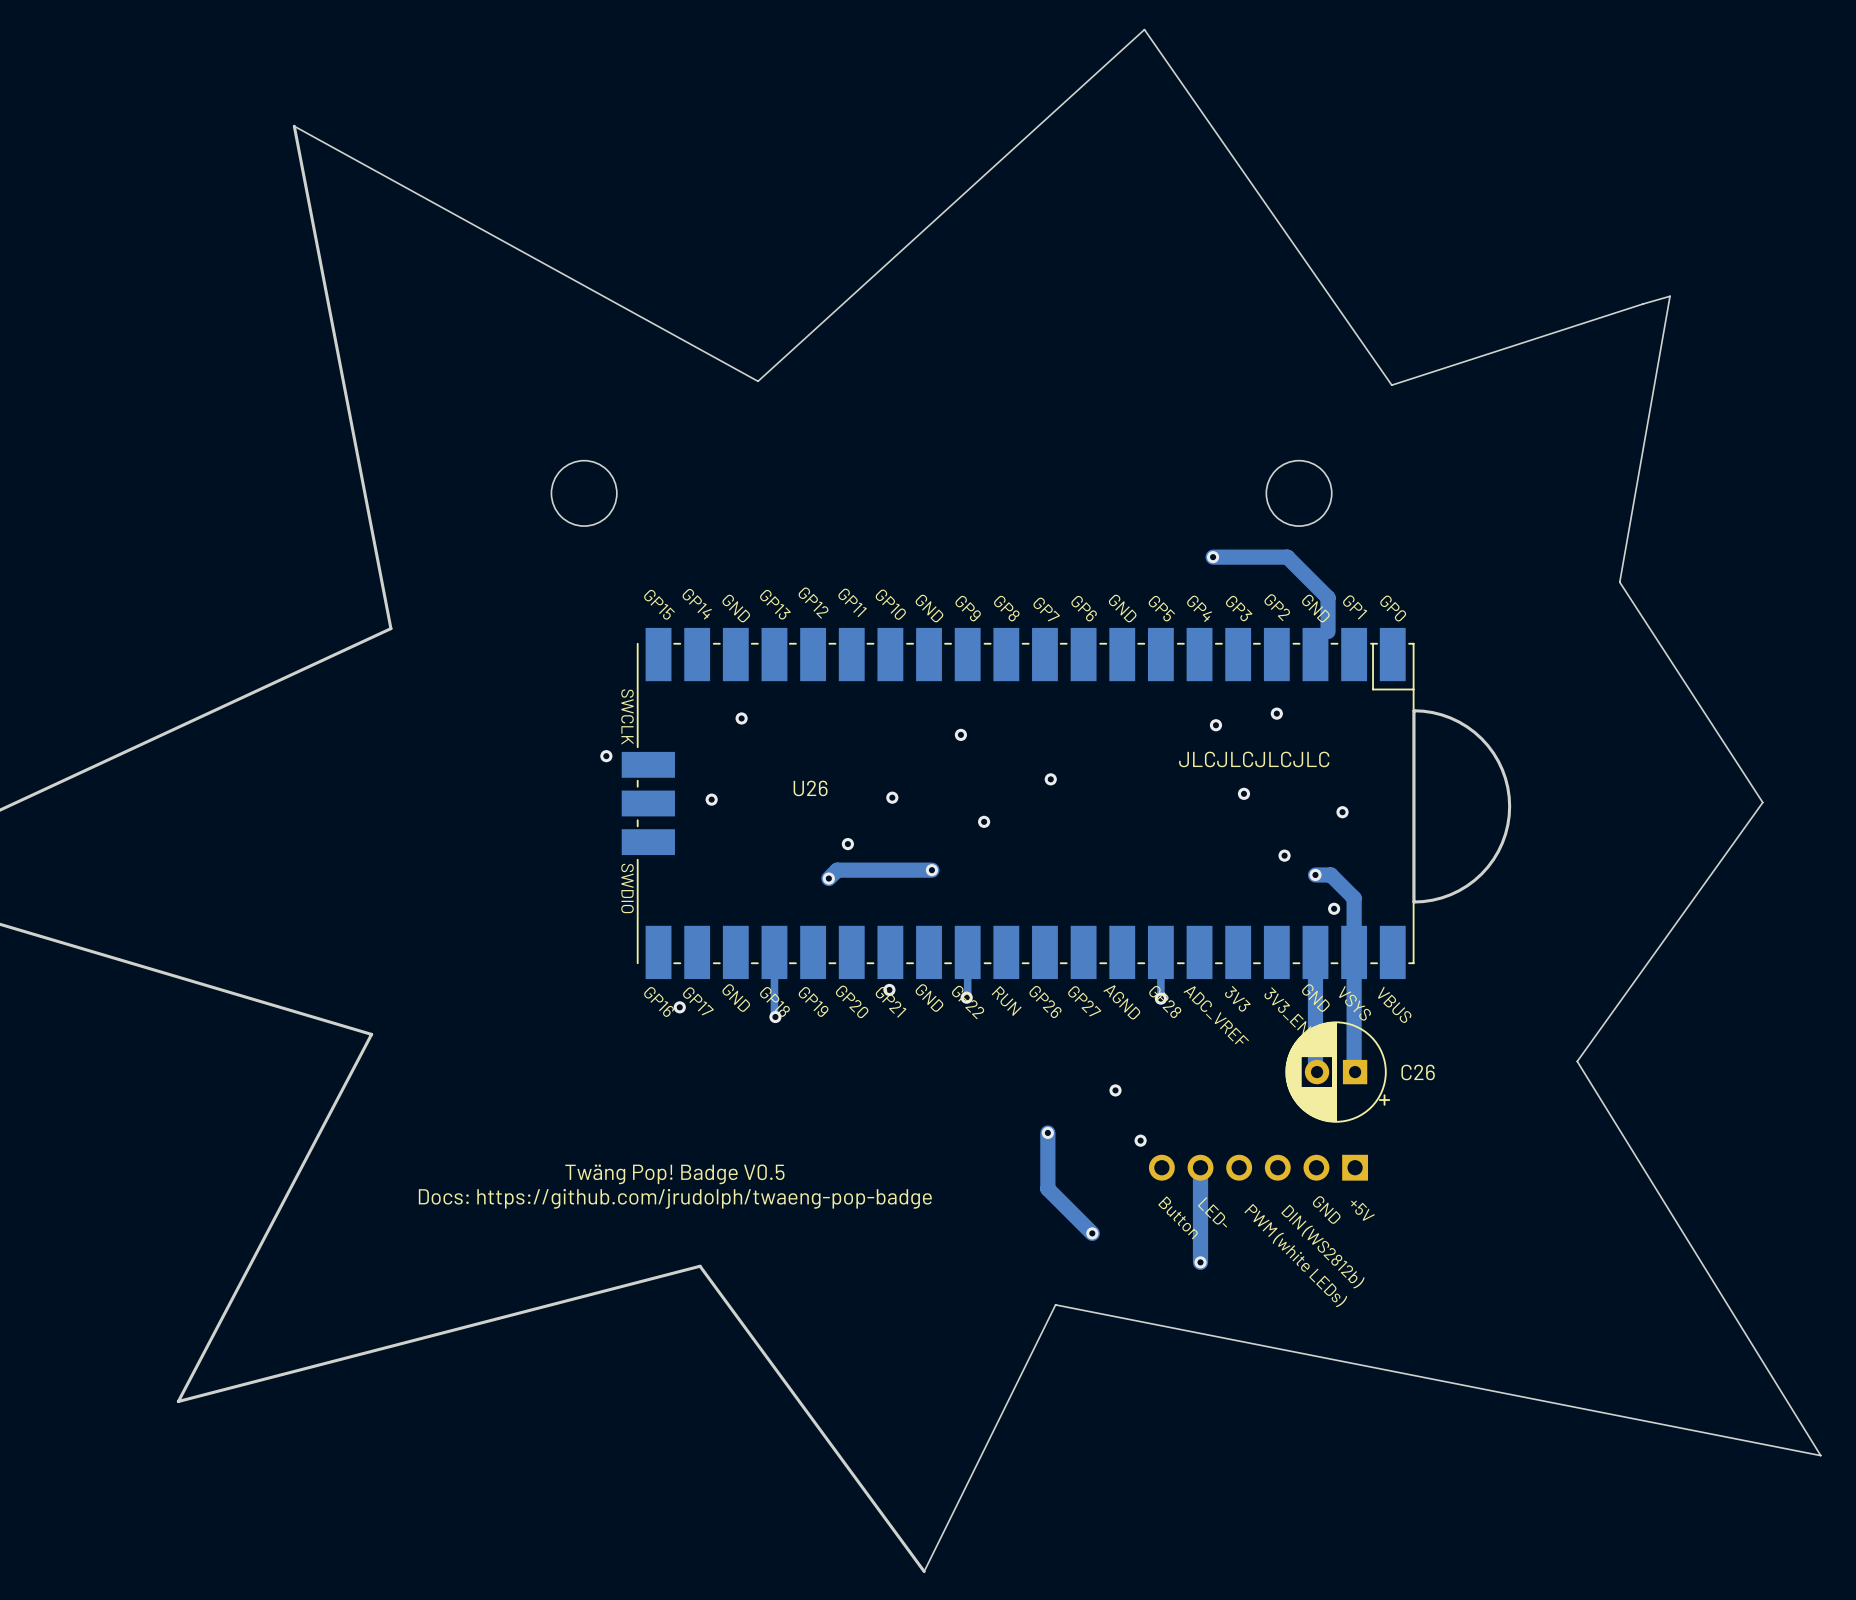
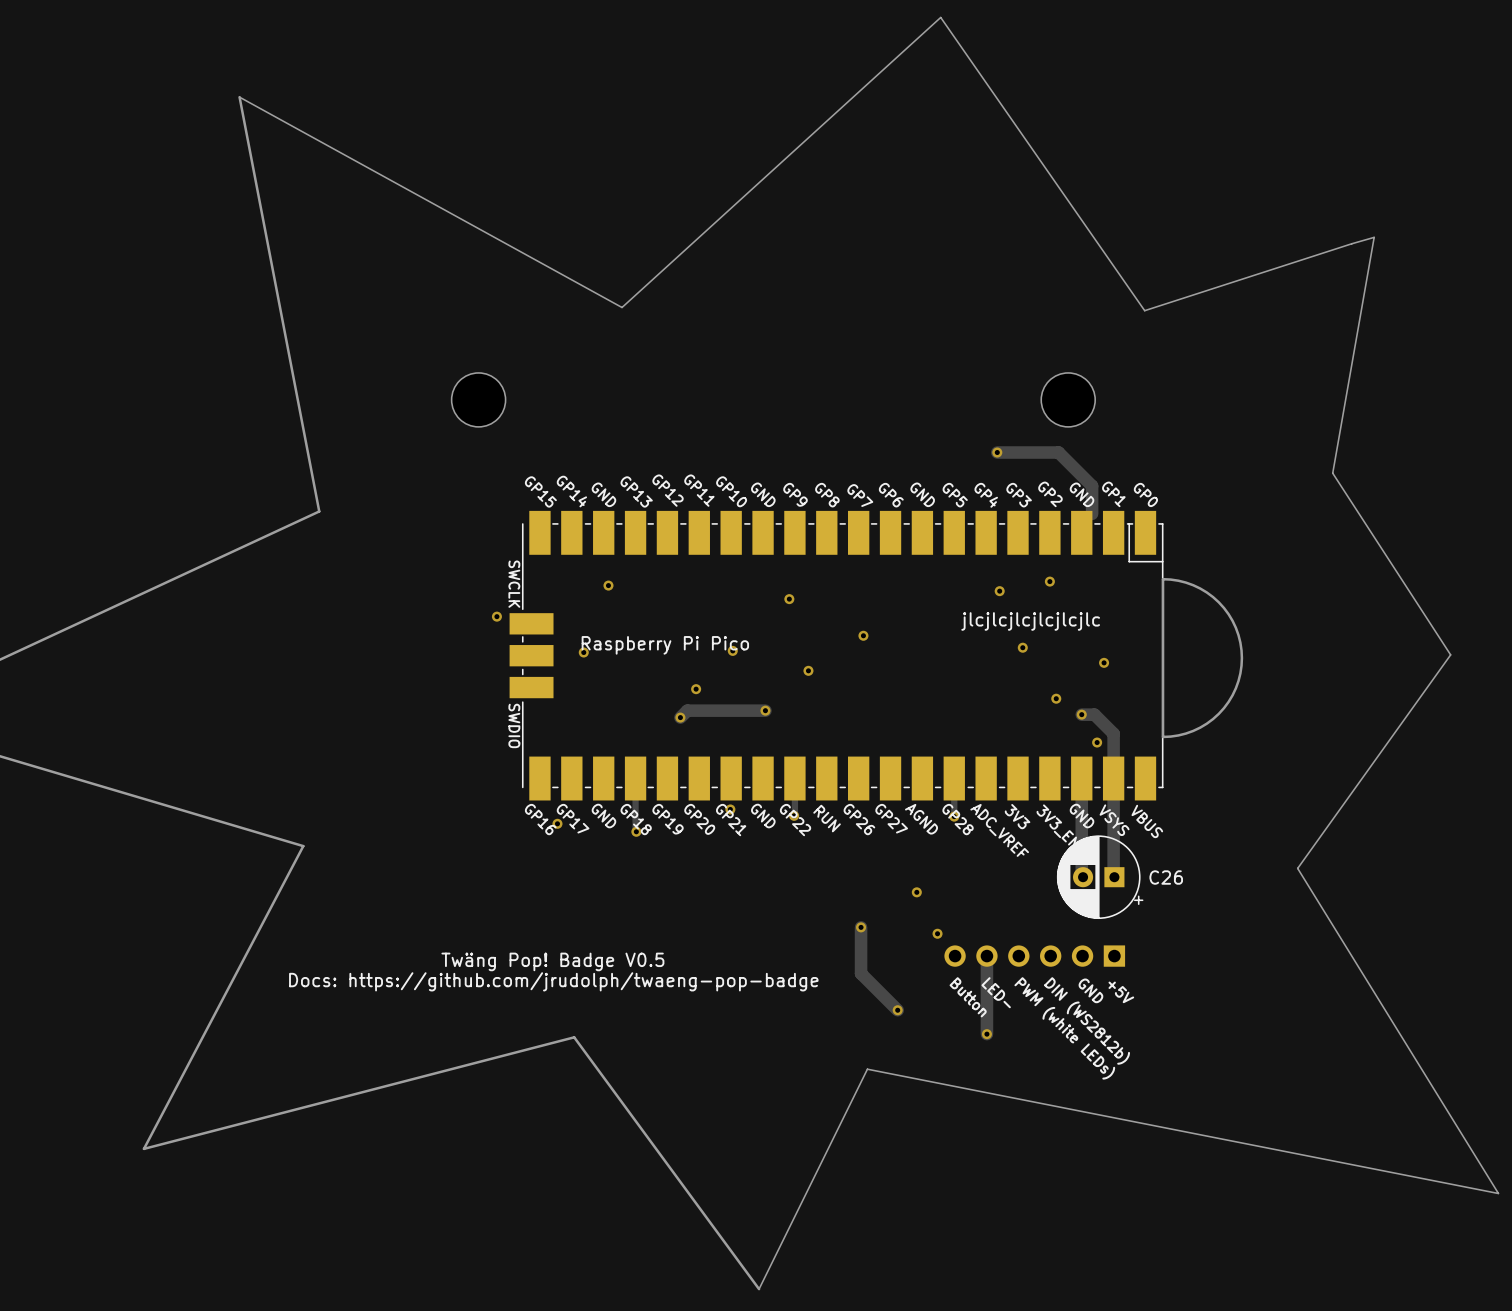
text: JLCJLCJLCJLC (1254, 759) -> jlcjlcjlcjlcjlcjlc (1030, 621)
U26 name: U26 (810, 788) -> Raspberry Pi Pico (665, 645)

